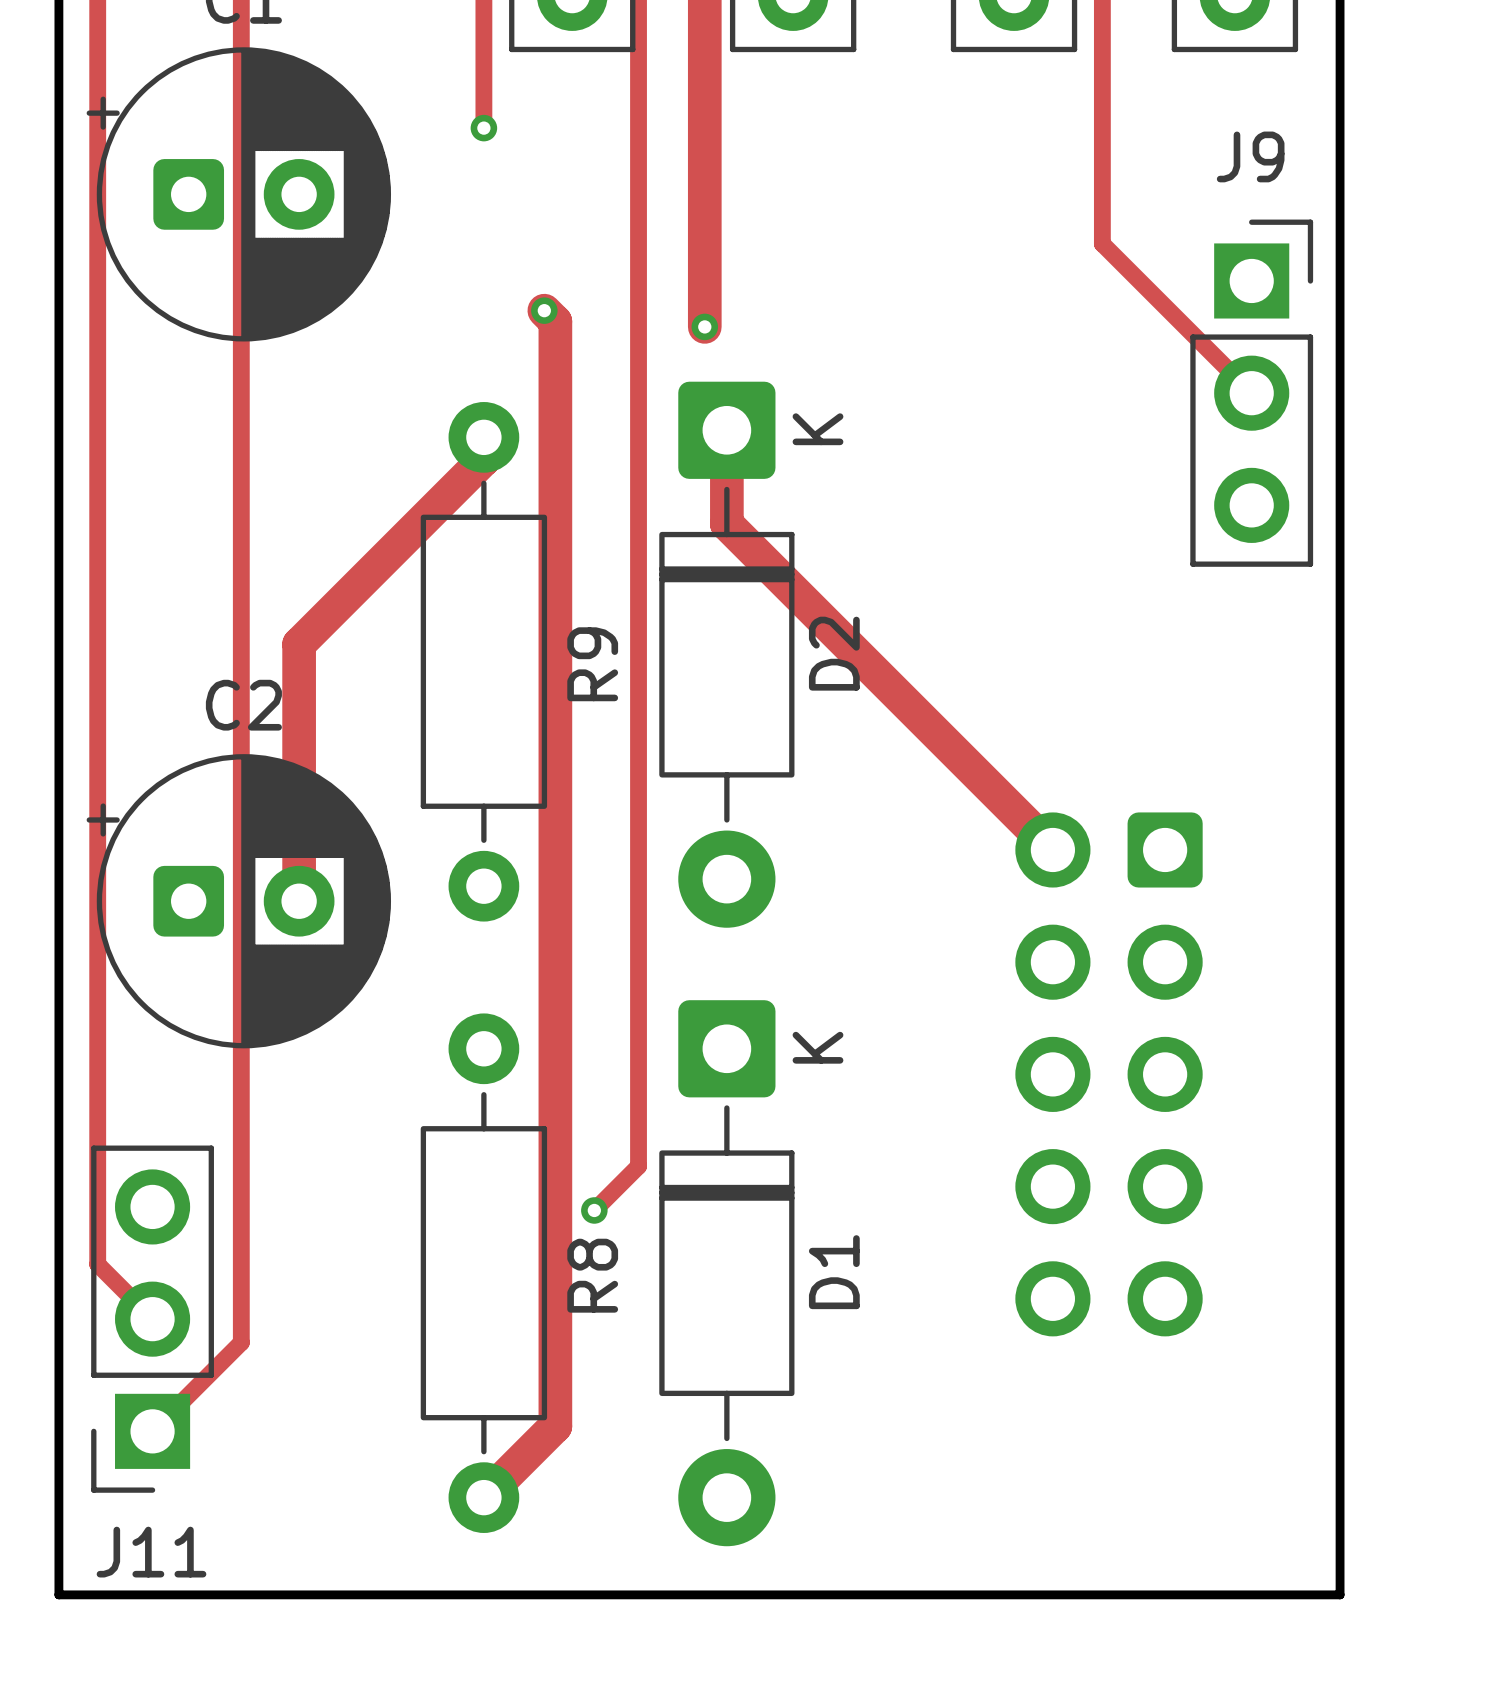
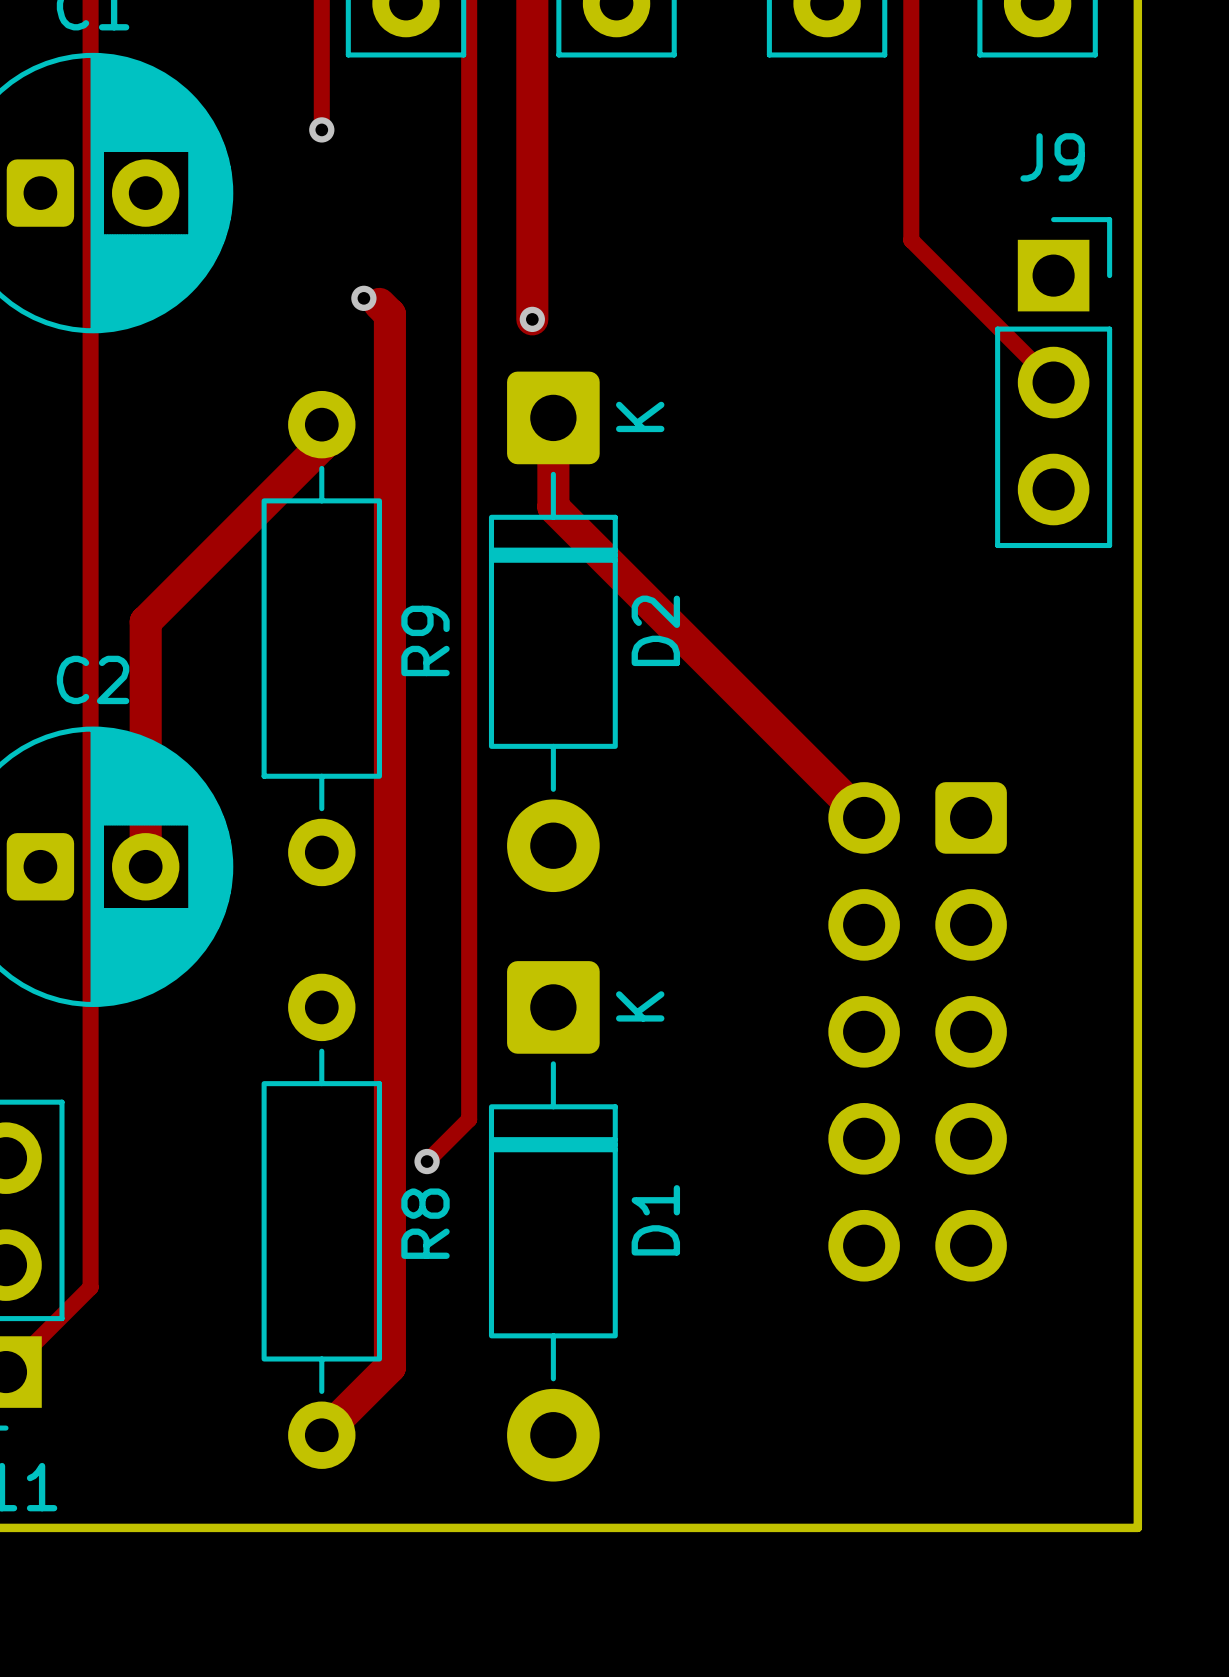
via position: (544, 310) -> (363, 298)

